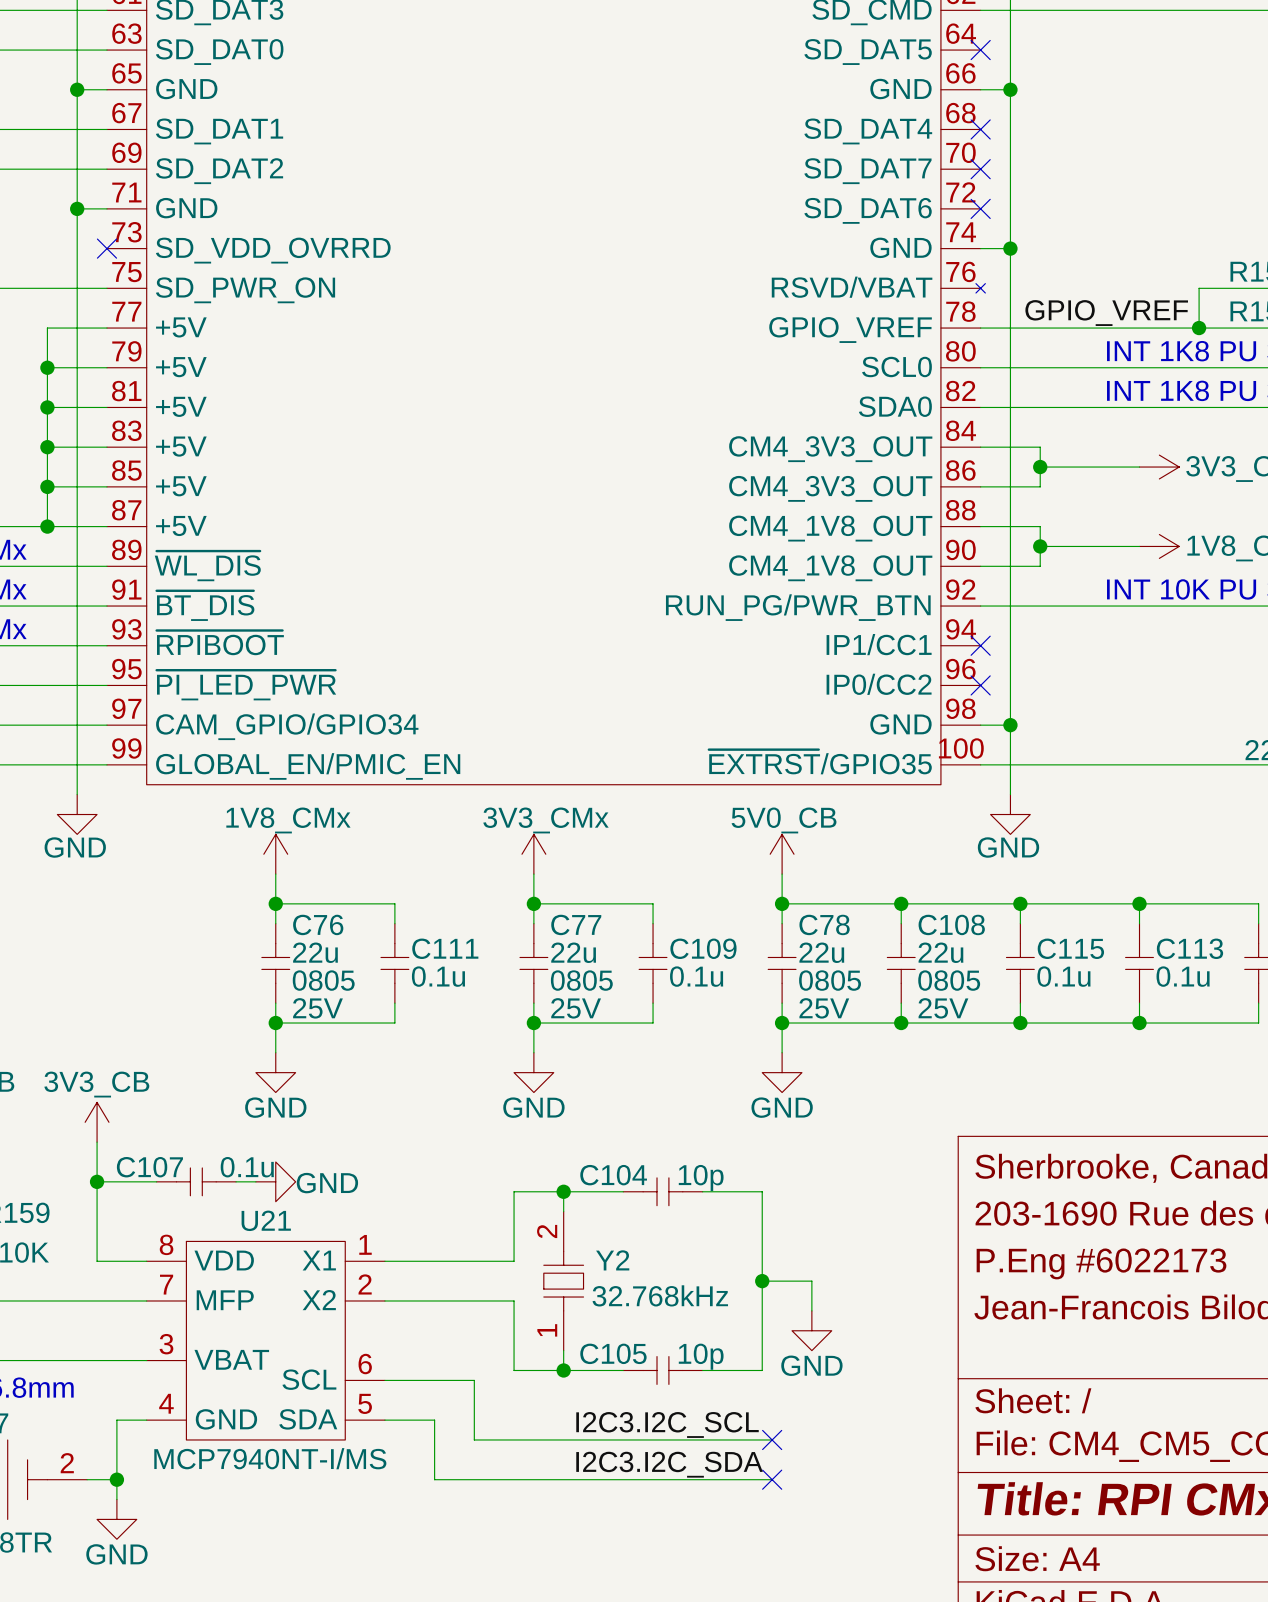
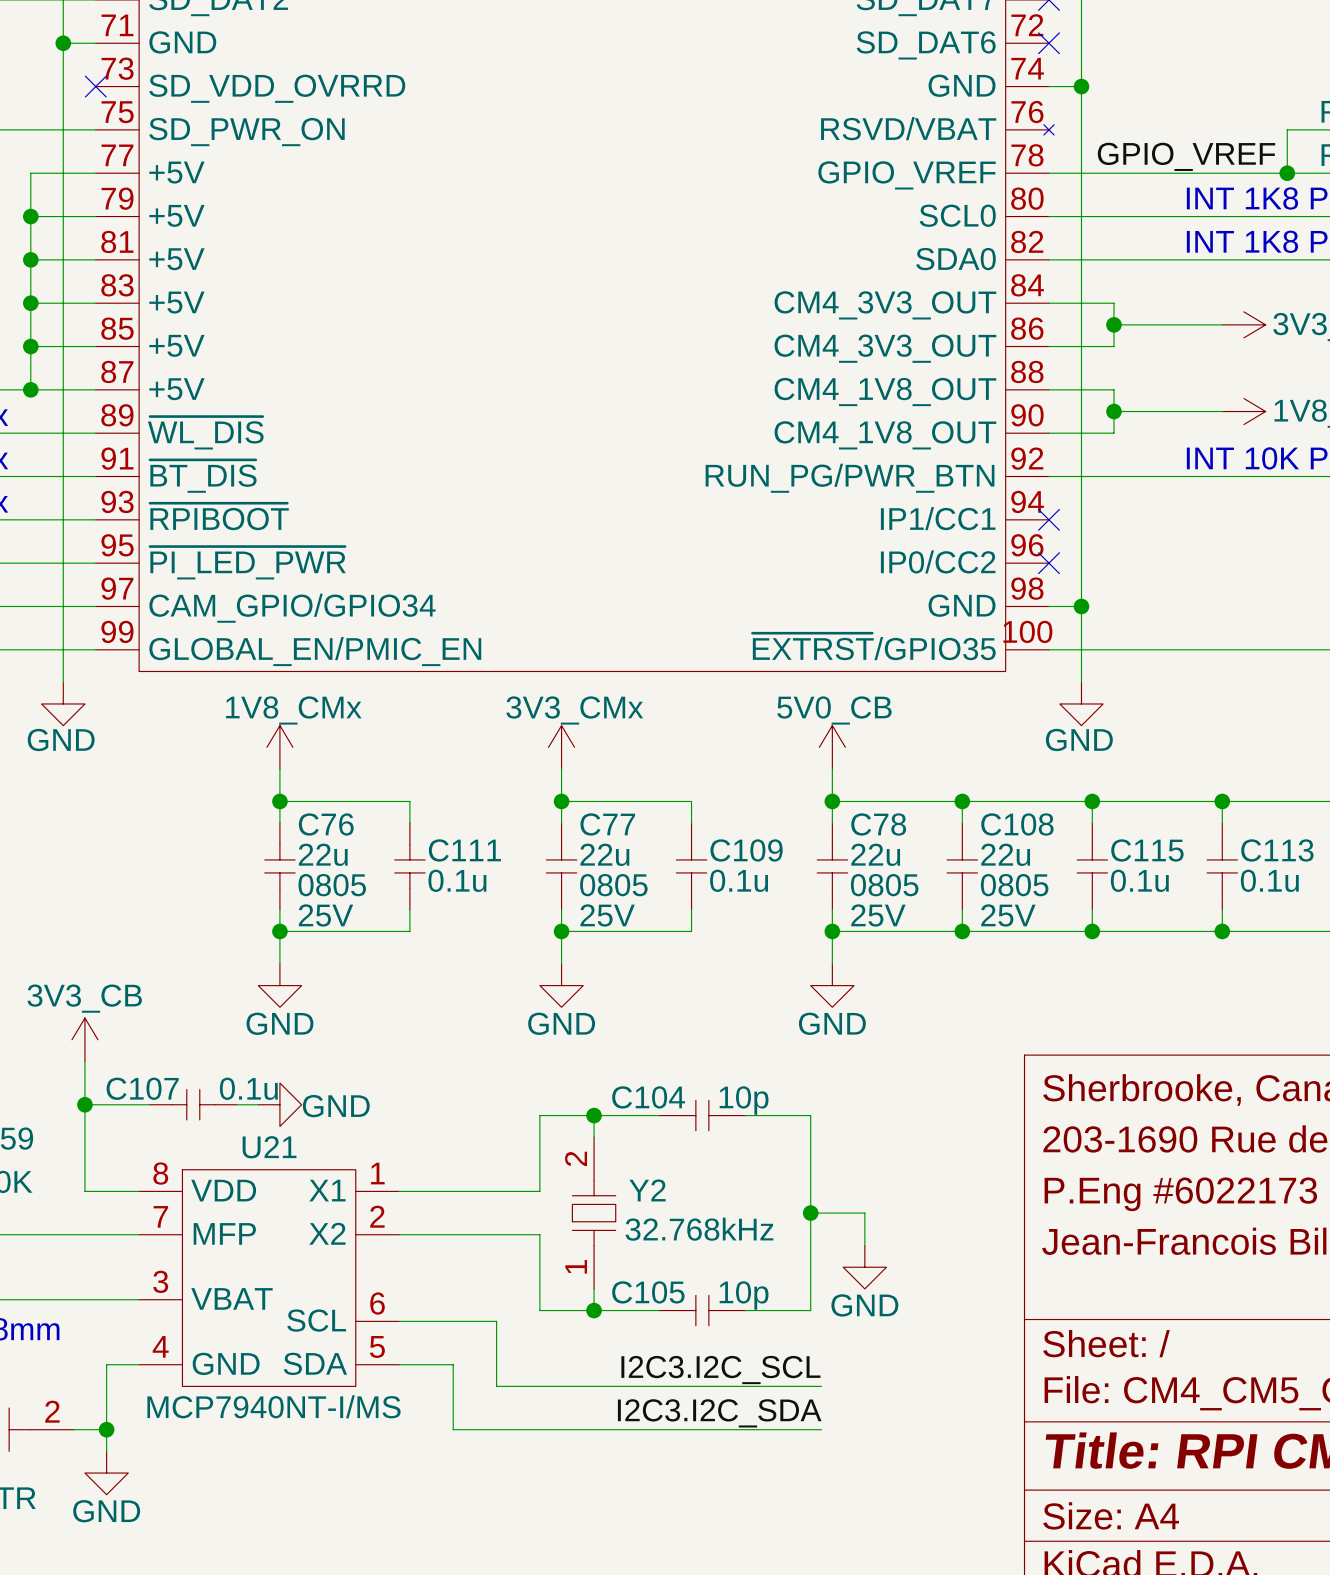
label position: I2C3.I2C_SCL (667, 1424) -> I2C3.I2C_SCL (720, 1370)
no-connect mark: (772, 1439) -> none
label position: I2C3.I2C_SDA (669, 1464) -> I2C3.I2C_SDA (719, 1413)
no-connect mark: (772, 1479) -> none

